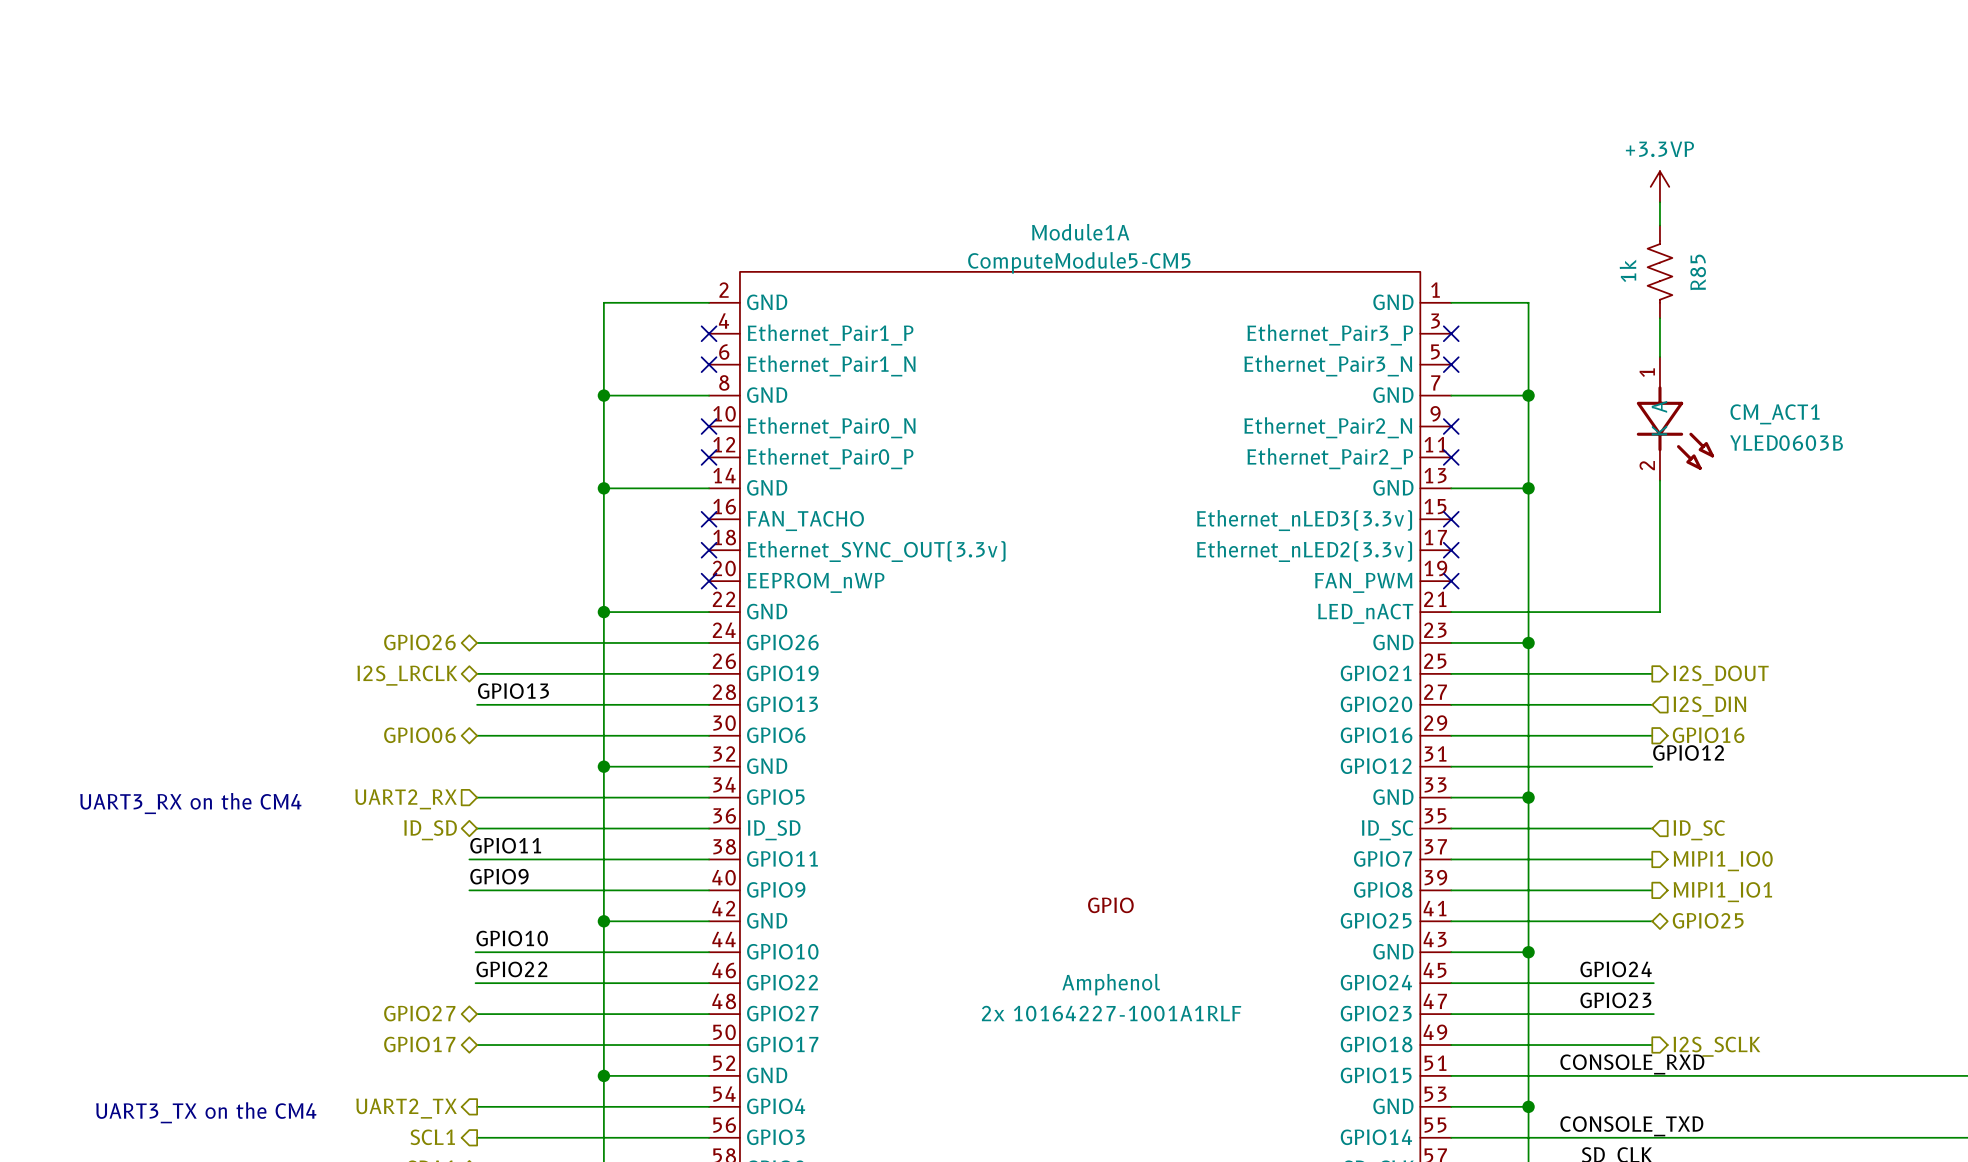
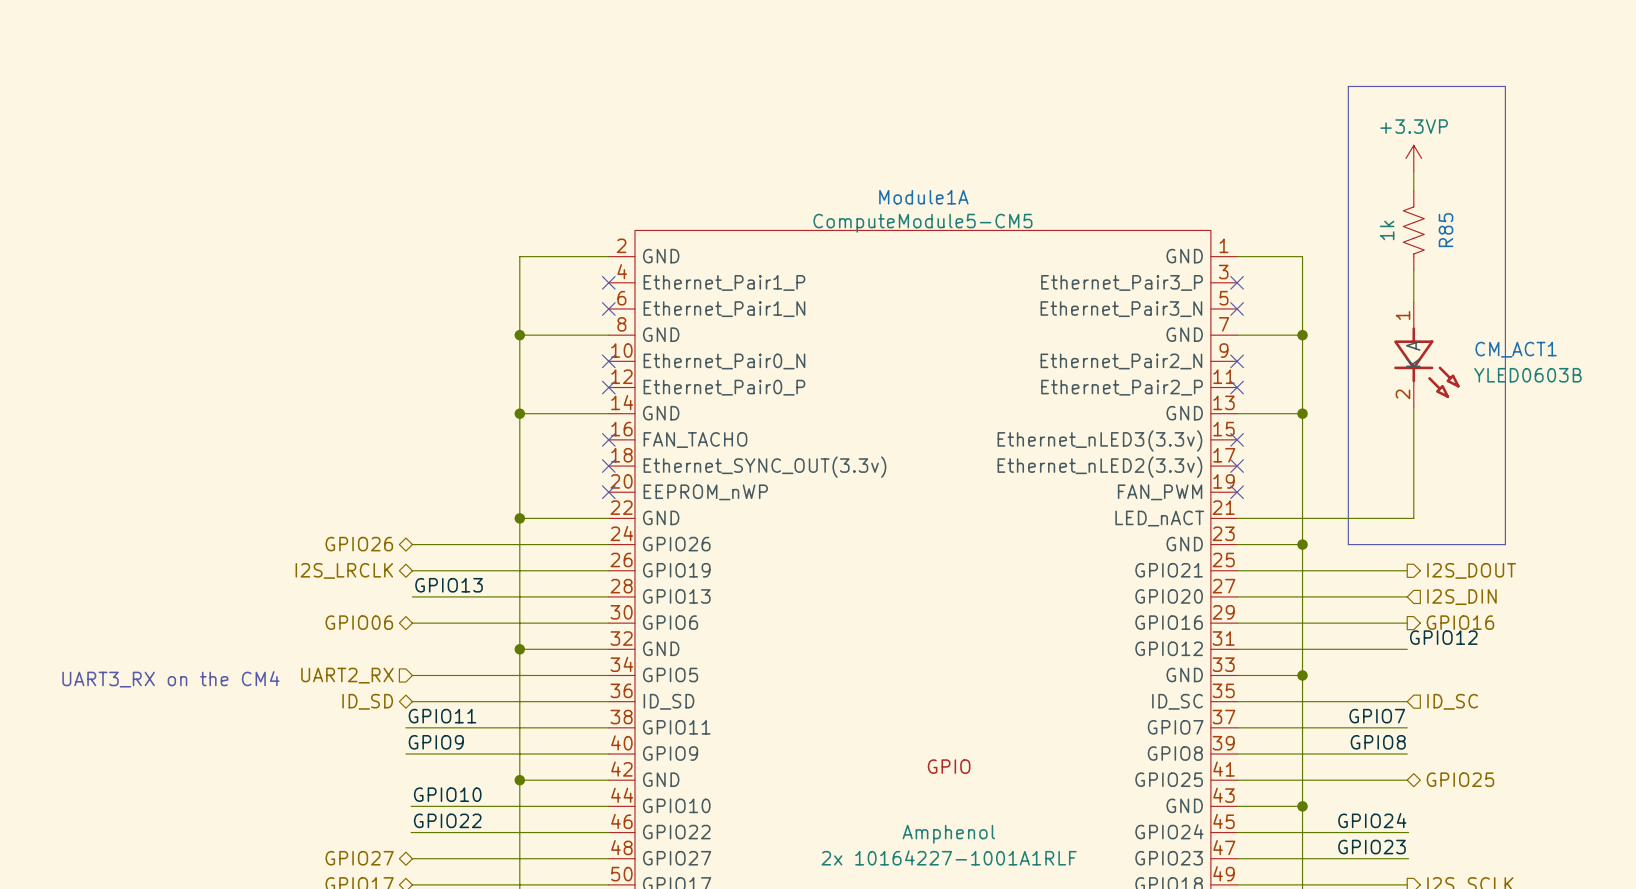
line: none -> (1348, 86) (1505, 86) (1505, 544) (1348, 544) (1348, 86)
label: none -> GPIO7 (1377, 716)
hierarchical label: MIPI1_IO0 (1723, 861) -> none
label: none -> GPIO8 (1378, 742)
hierarchical label: MIPI1_IO1 (1722, 892) -> none

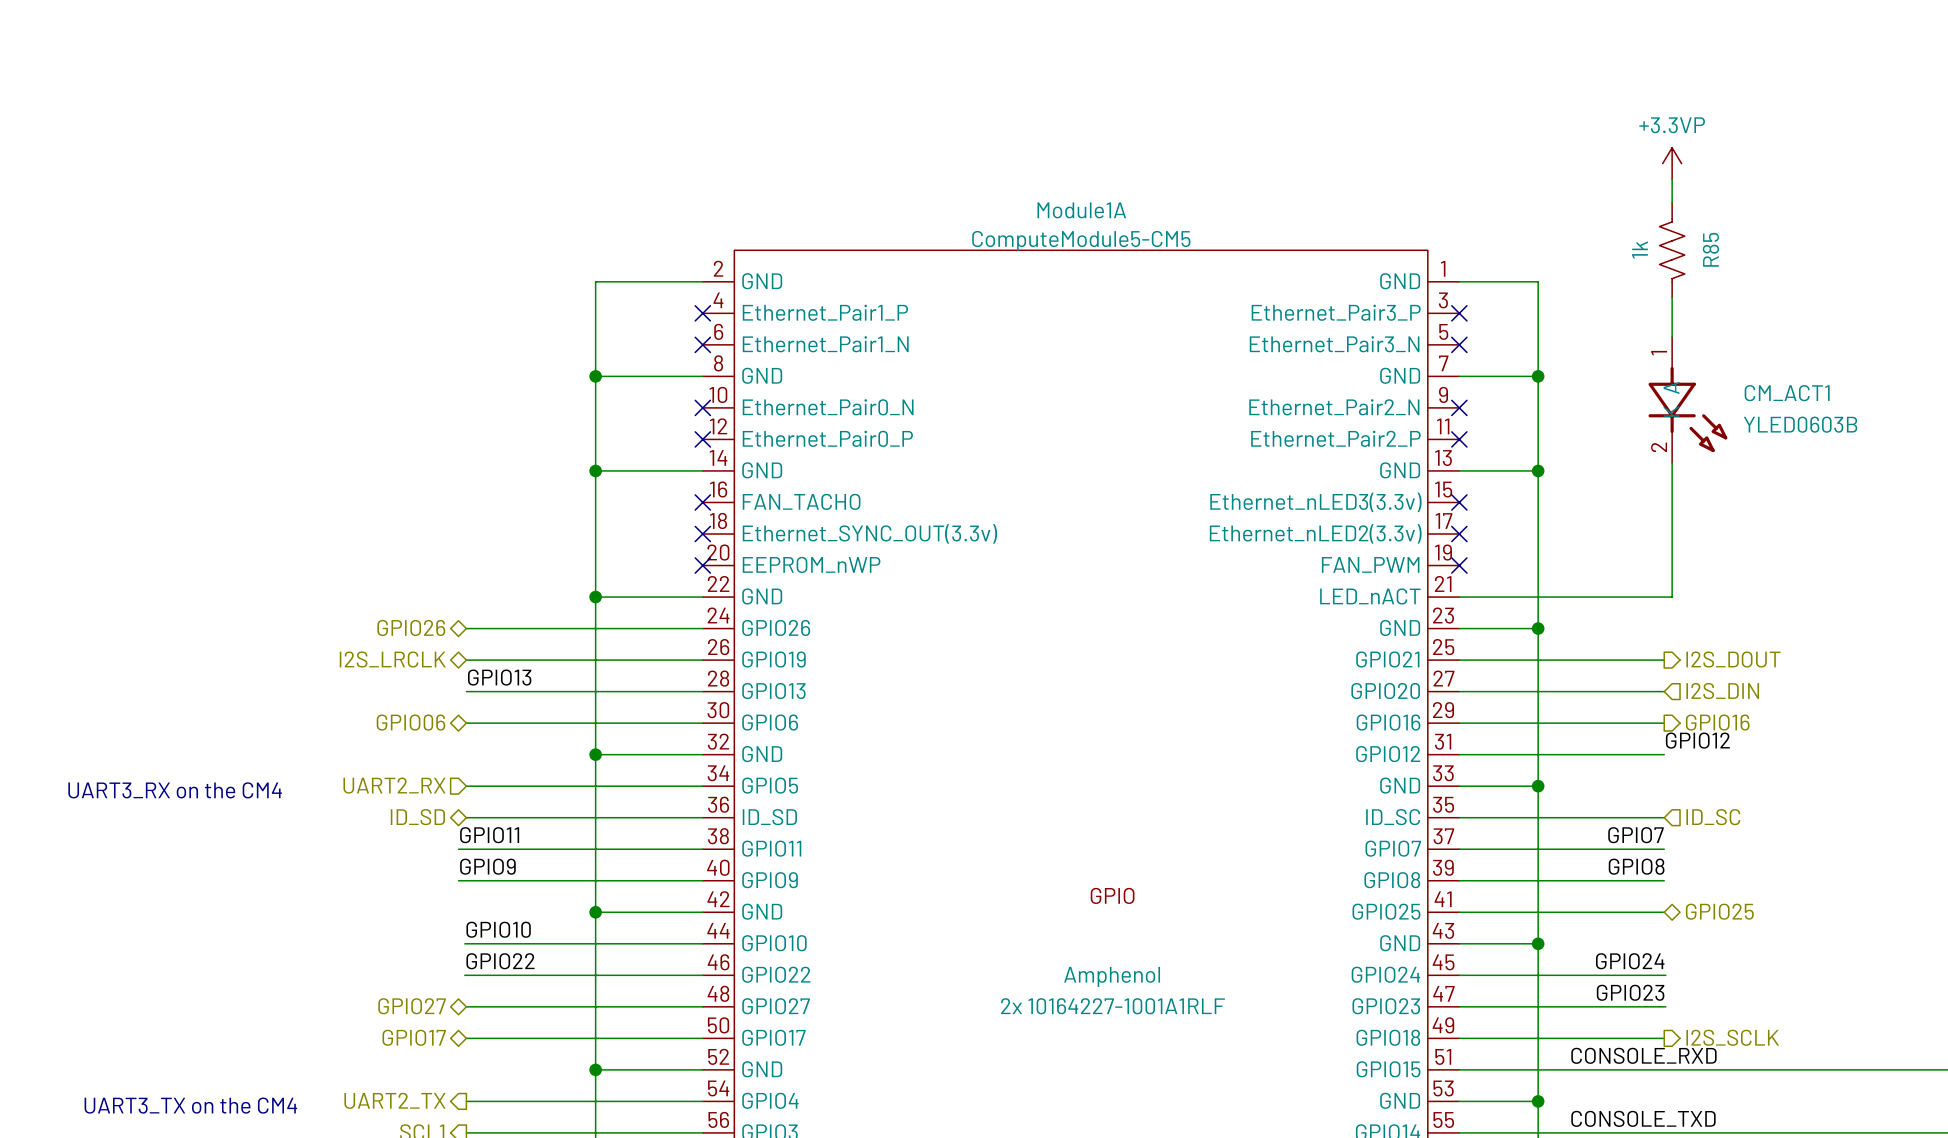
line: (1348, 86) (1505, 86) (1505, 544) (1348, 544) (1348, 86) -> none

